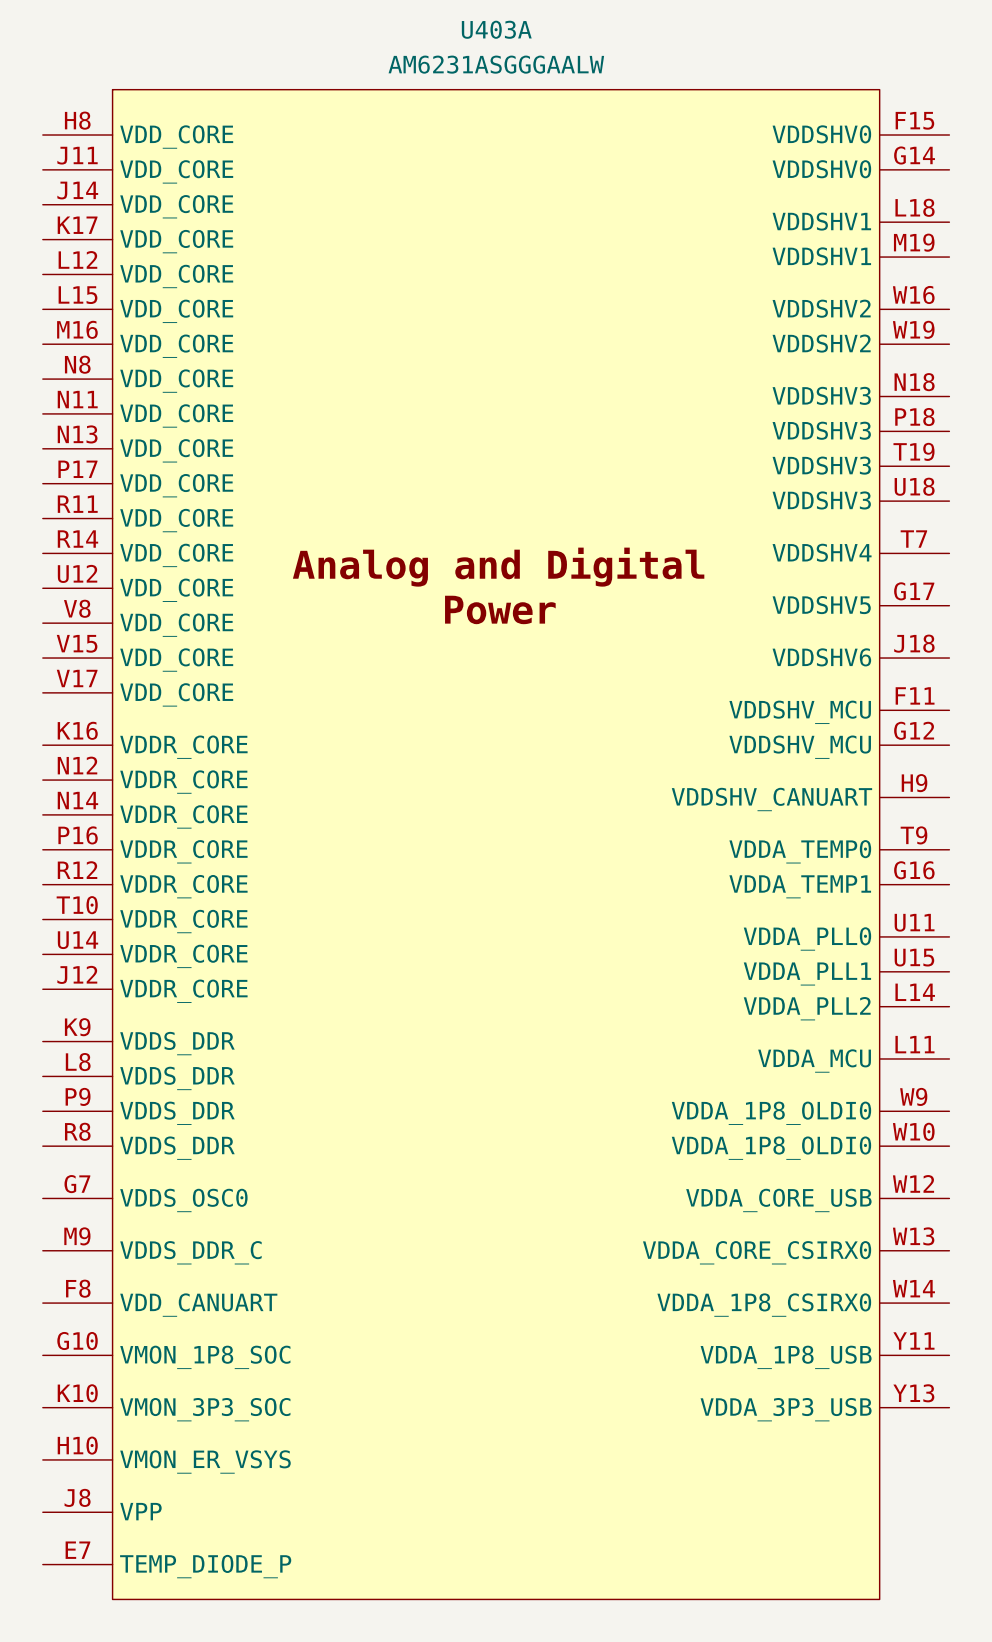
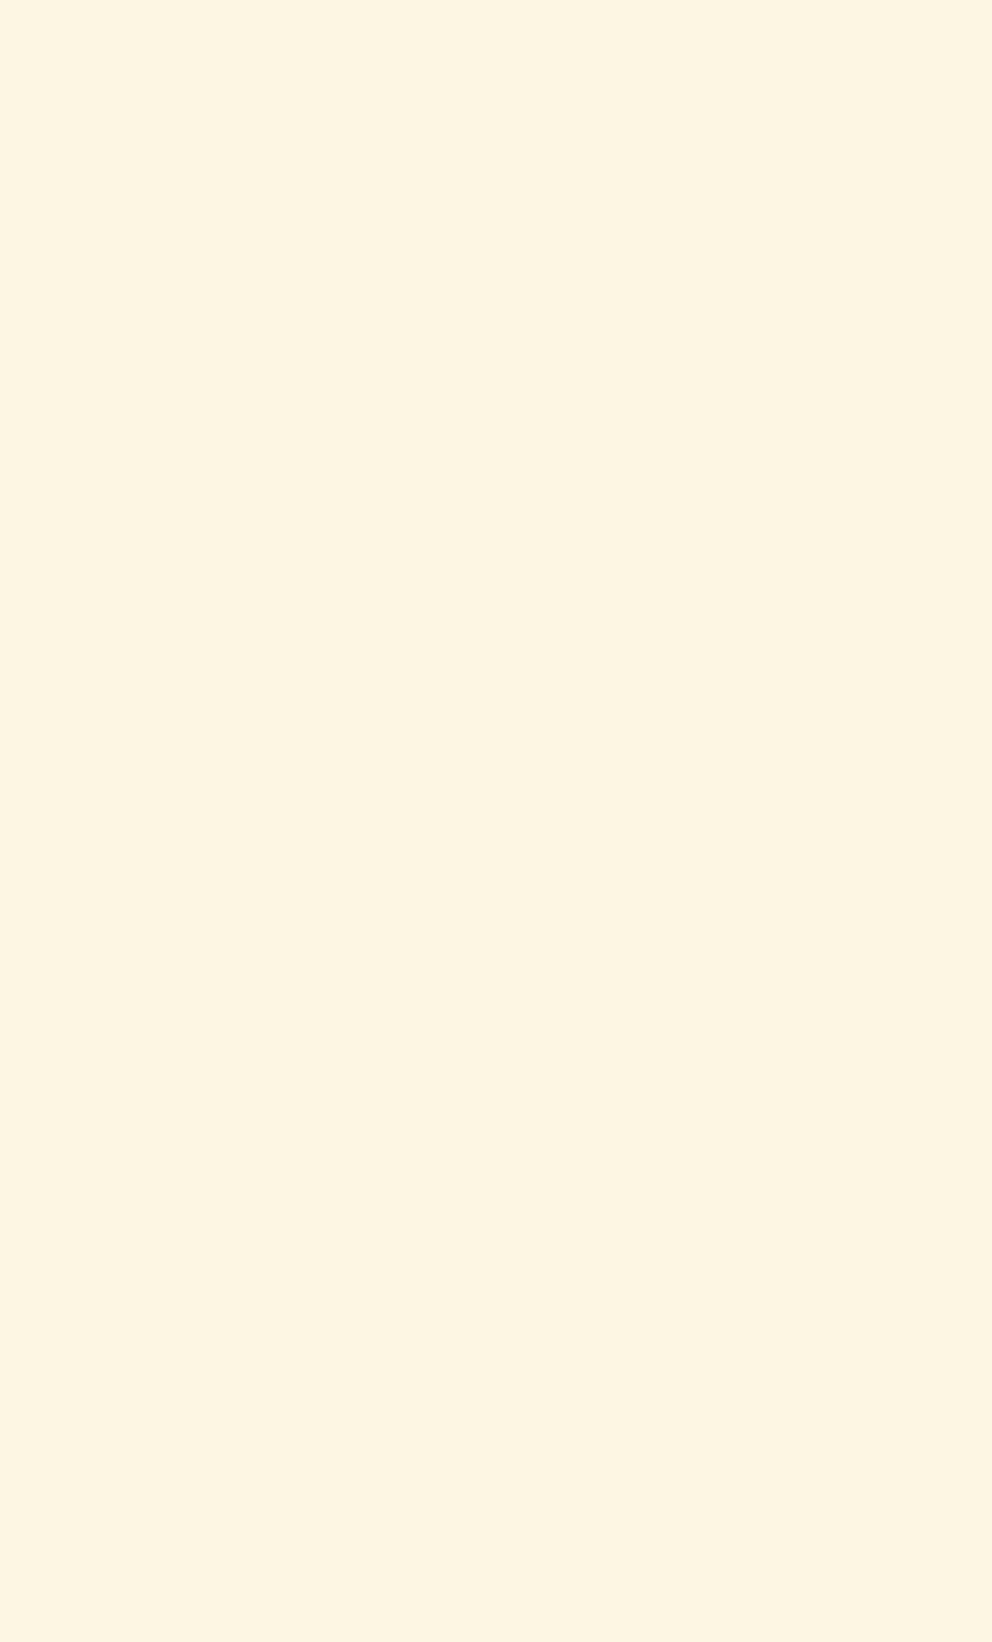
U403A: AM6231ASGGGAALW (496, 844) -> none

